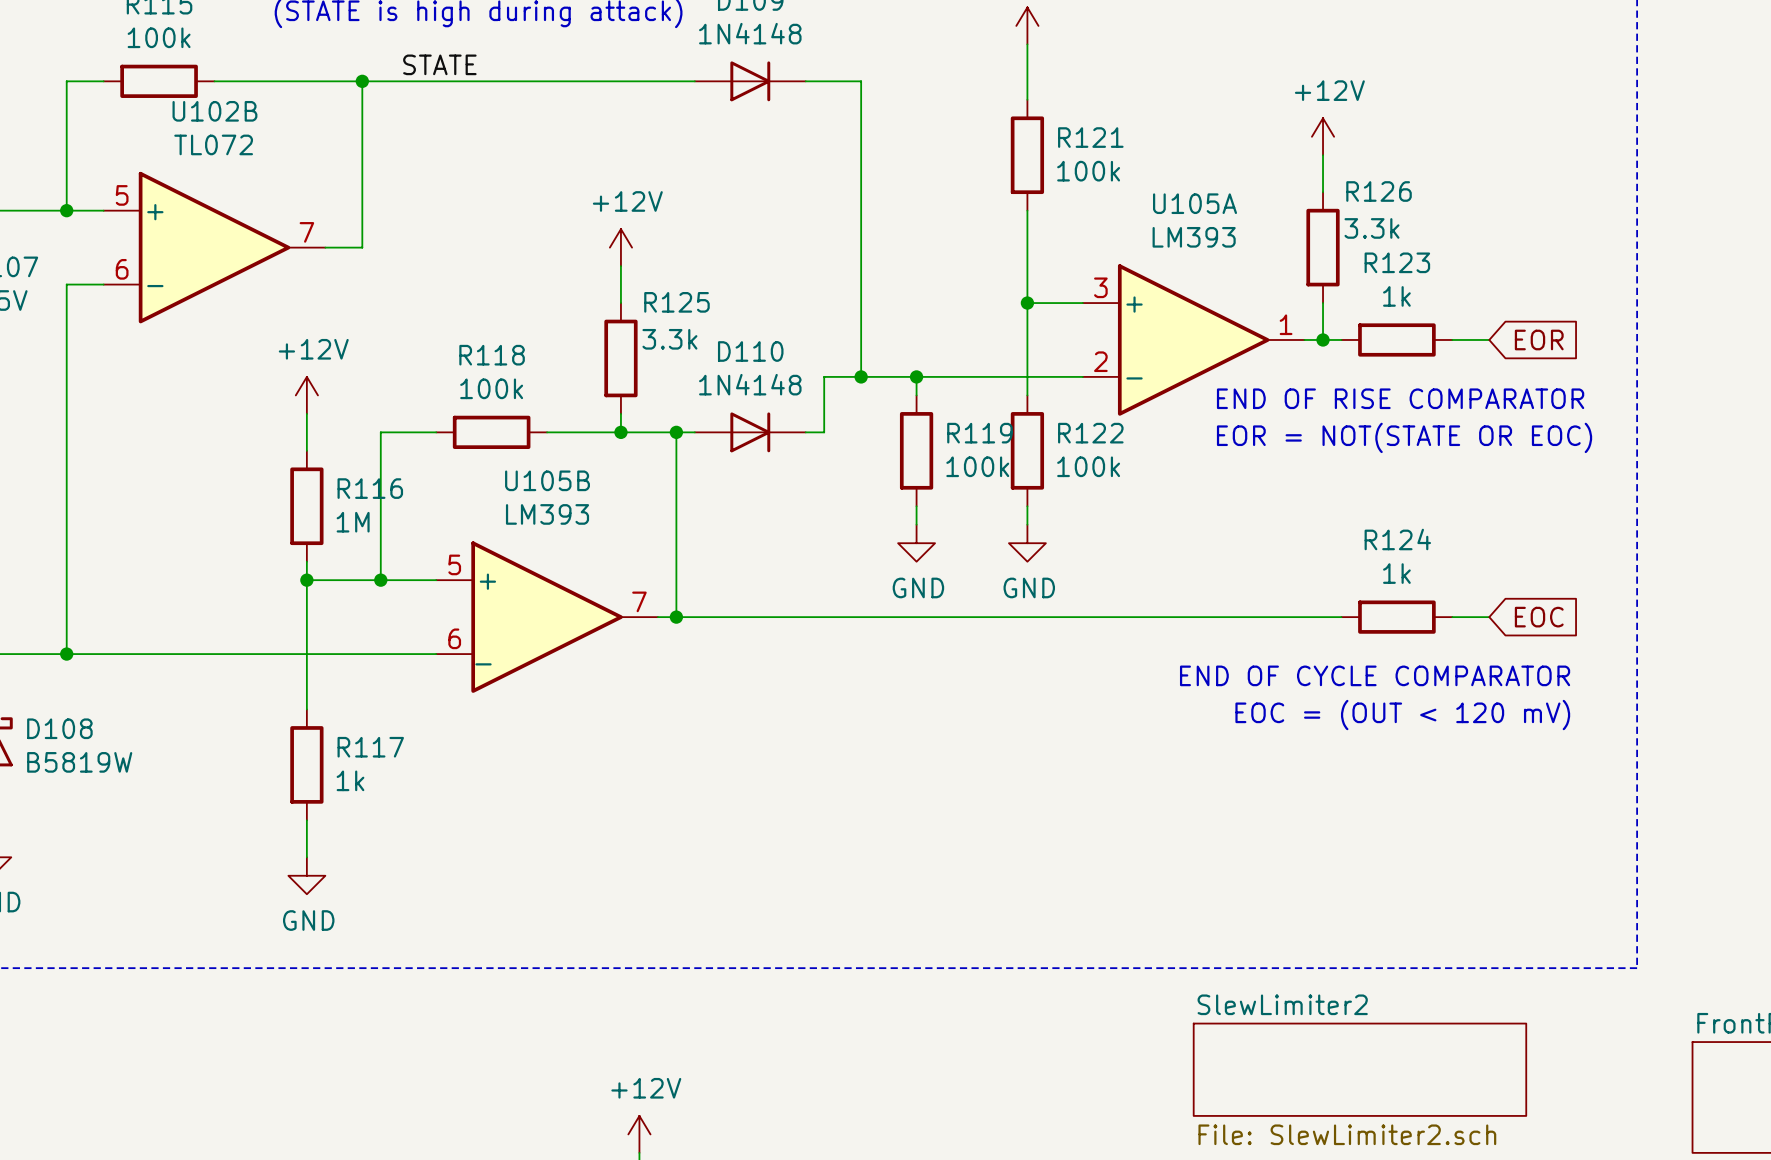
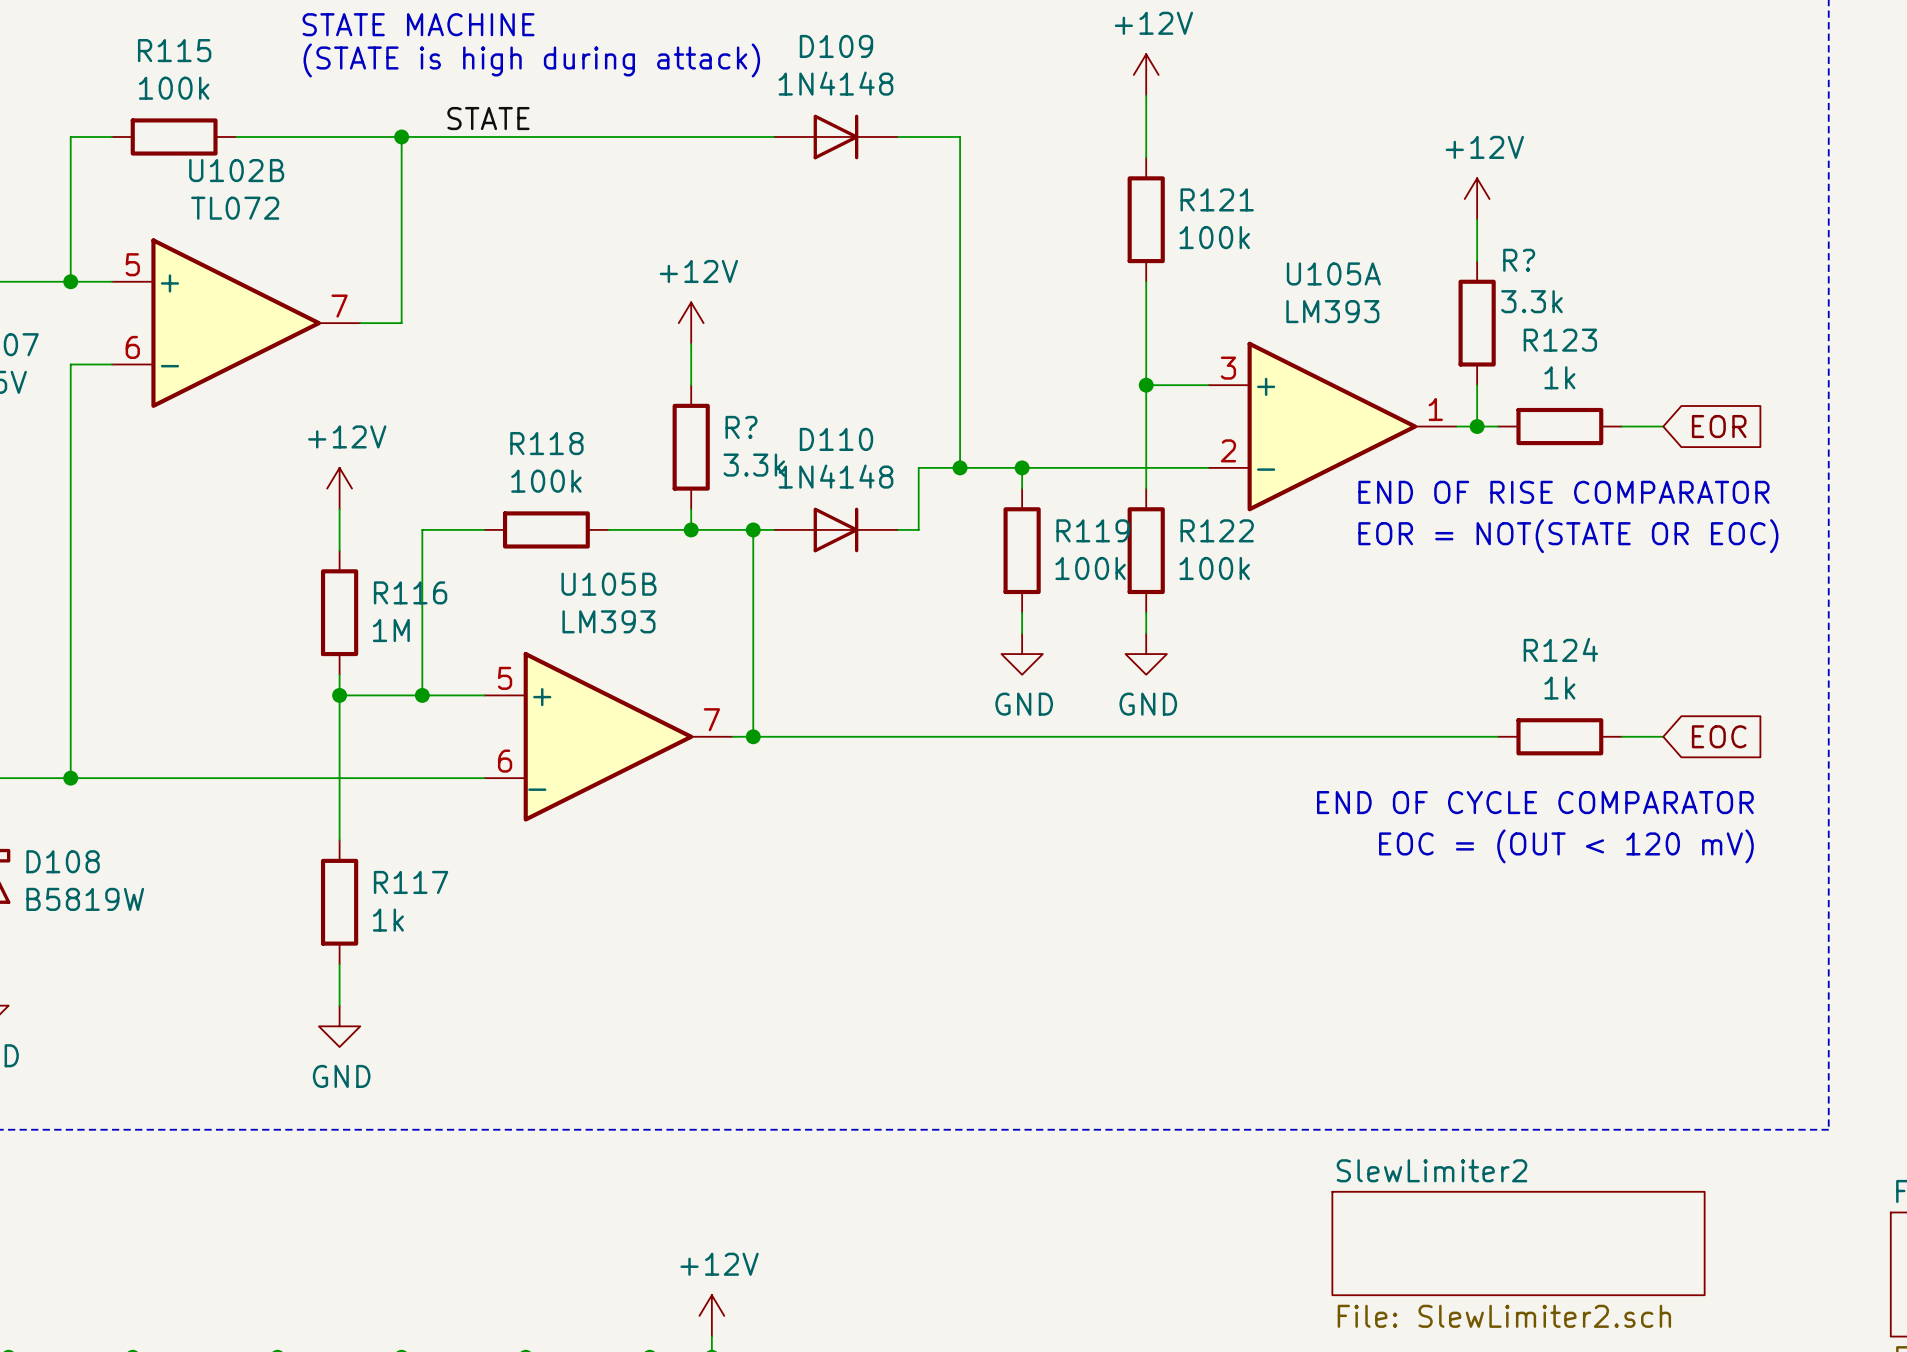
R126 name: R126 (1379, 191) -> R? (1519, 260)
R125 name: R125 (676, 302) -> R? (741, 427)
R125 value position: 3.3k (669, 339) -> 3.3k (754, 465)

